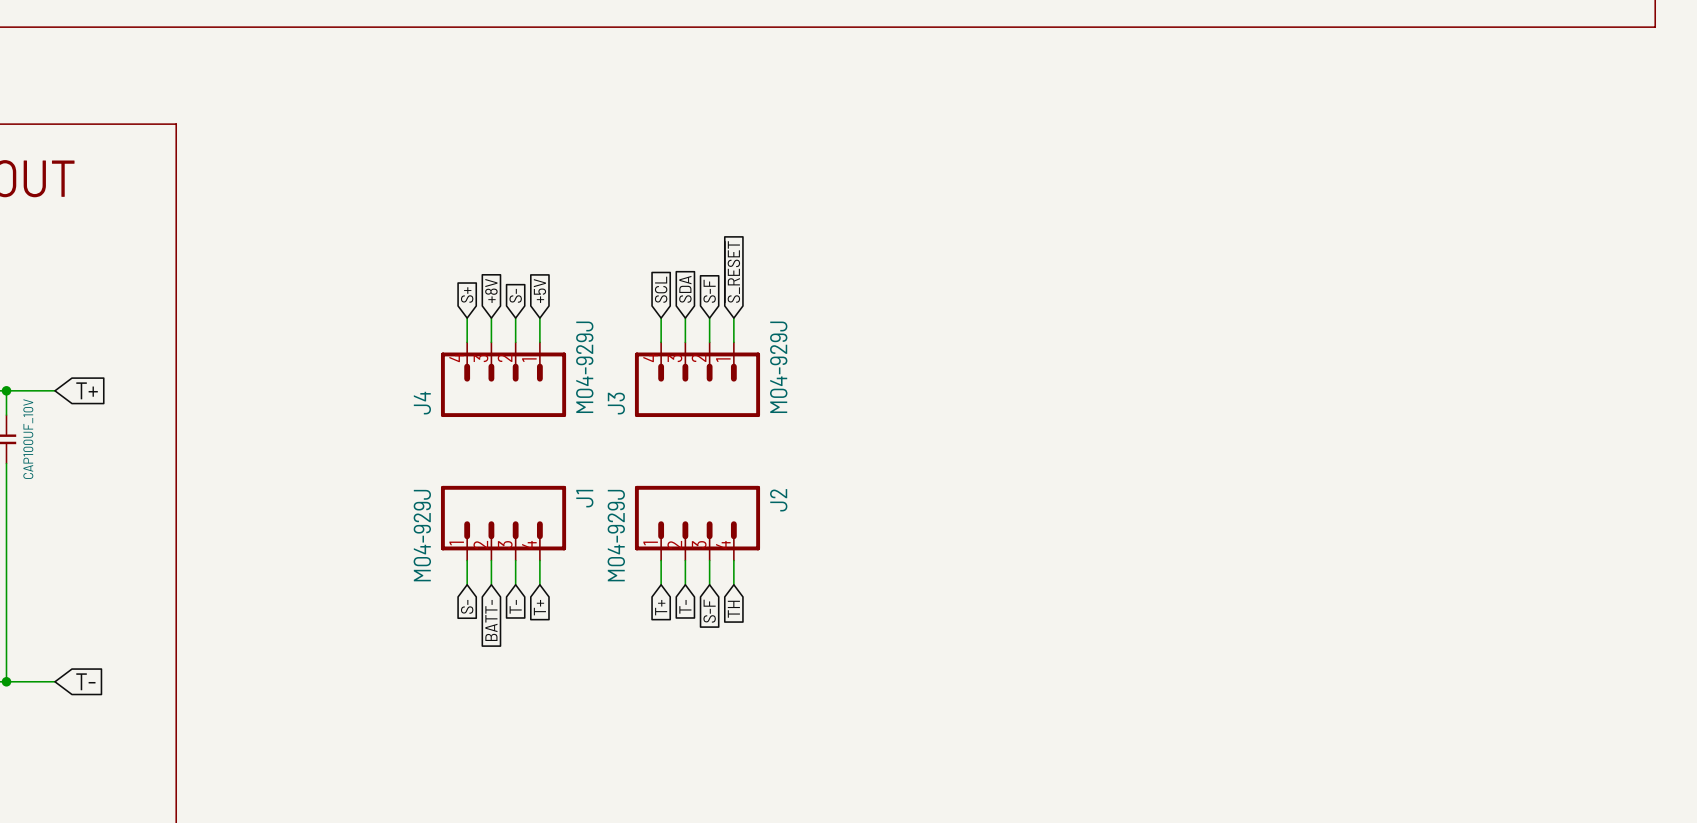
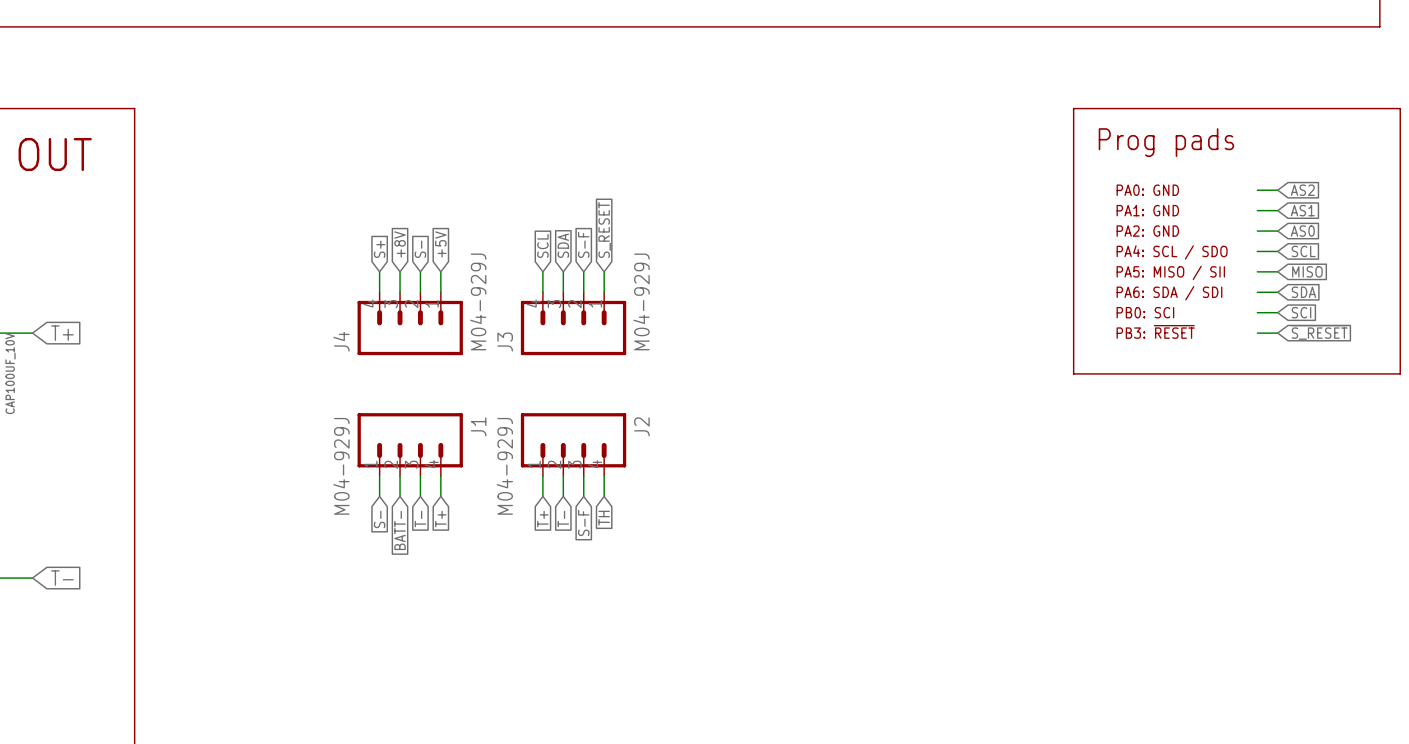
line: none -> (1073, 108) (1400, 108) (1400, 373) (1073, 373) (1073, 108)
text: none -> Prog pads (1166, 142)
text: none -> PA0: GND (1147, 190)
wire: none -> (1257, 190) (1277, 190)
global label: none -> AS2 (1302, 190)
text: none -> PA1: GND (1147, 210)
wire: none -> (1257, 210) (1277, 210)
global label: none -> AS1 (1302, 210)
text: none -> PA2: GND (1147, 231)
wire: none -> (1257, 231) (1277, 231)
global label: none -> AS0 (1302, 231)
text: none -> PA4: SCL / SDO (1172, 252)
wire: none -> (1257, 251) (1277, 251)
global label: none -> SCL (1303, 251)
text: none -> PA5: MISO / SII (1170, 272)
wire: none -> (1257, 271) (1277, 271)
global label: none -> MISO (1307, 271)
text: none -> PA6: SDA / SDI (1169, 293)
wire: none -> (1257, 292) (1277, 292)
global label: none -> SDA (1303, 292)
text: none -> PB0: SCI (1145, 312)
wire: none -> (1257, 312) (1277, 312)
global label: none -> SCI (1301, 312)
text: none -> PB3: ~{RESET} (1155, 331)
global label: none -> ~{S_RESET} (1319, 332)
wire: none -> (1257, 333) (1277, 333)

